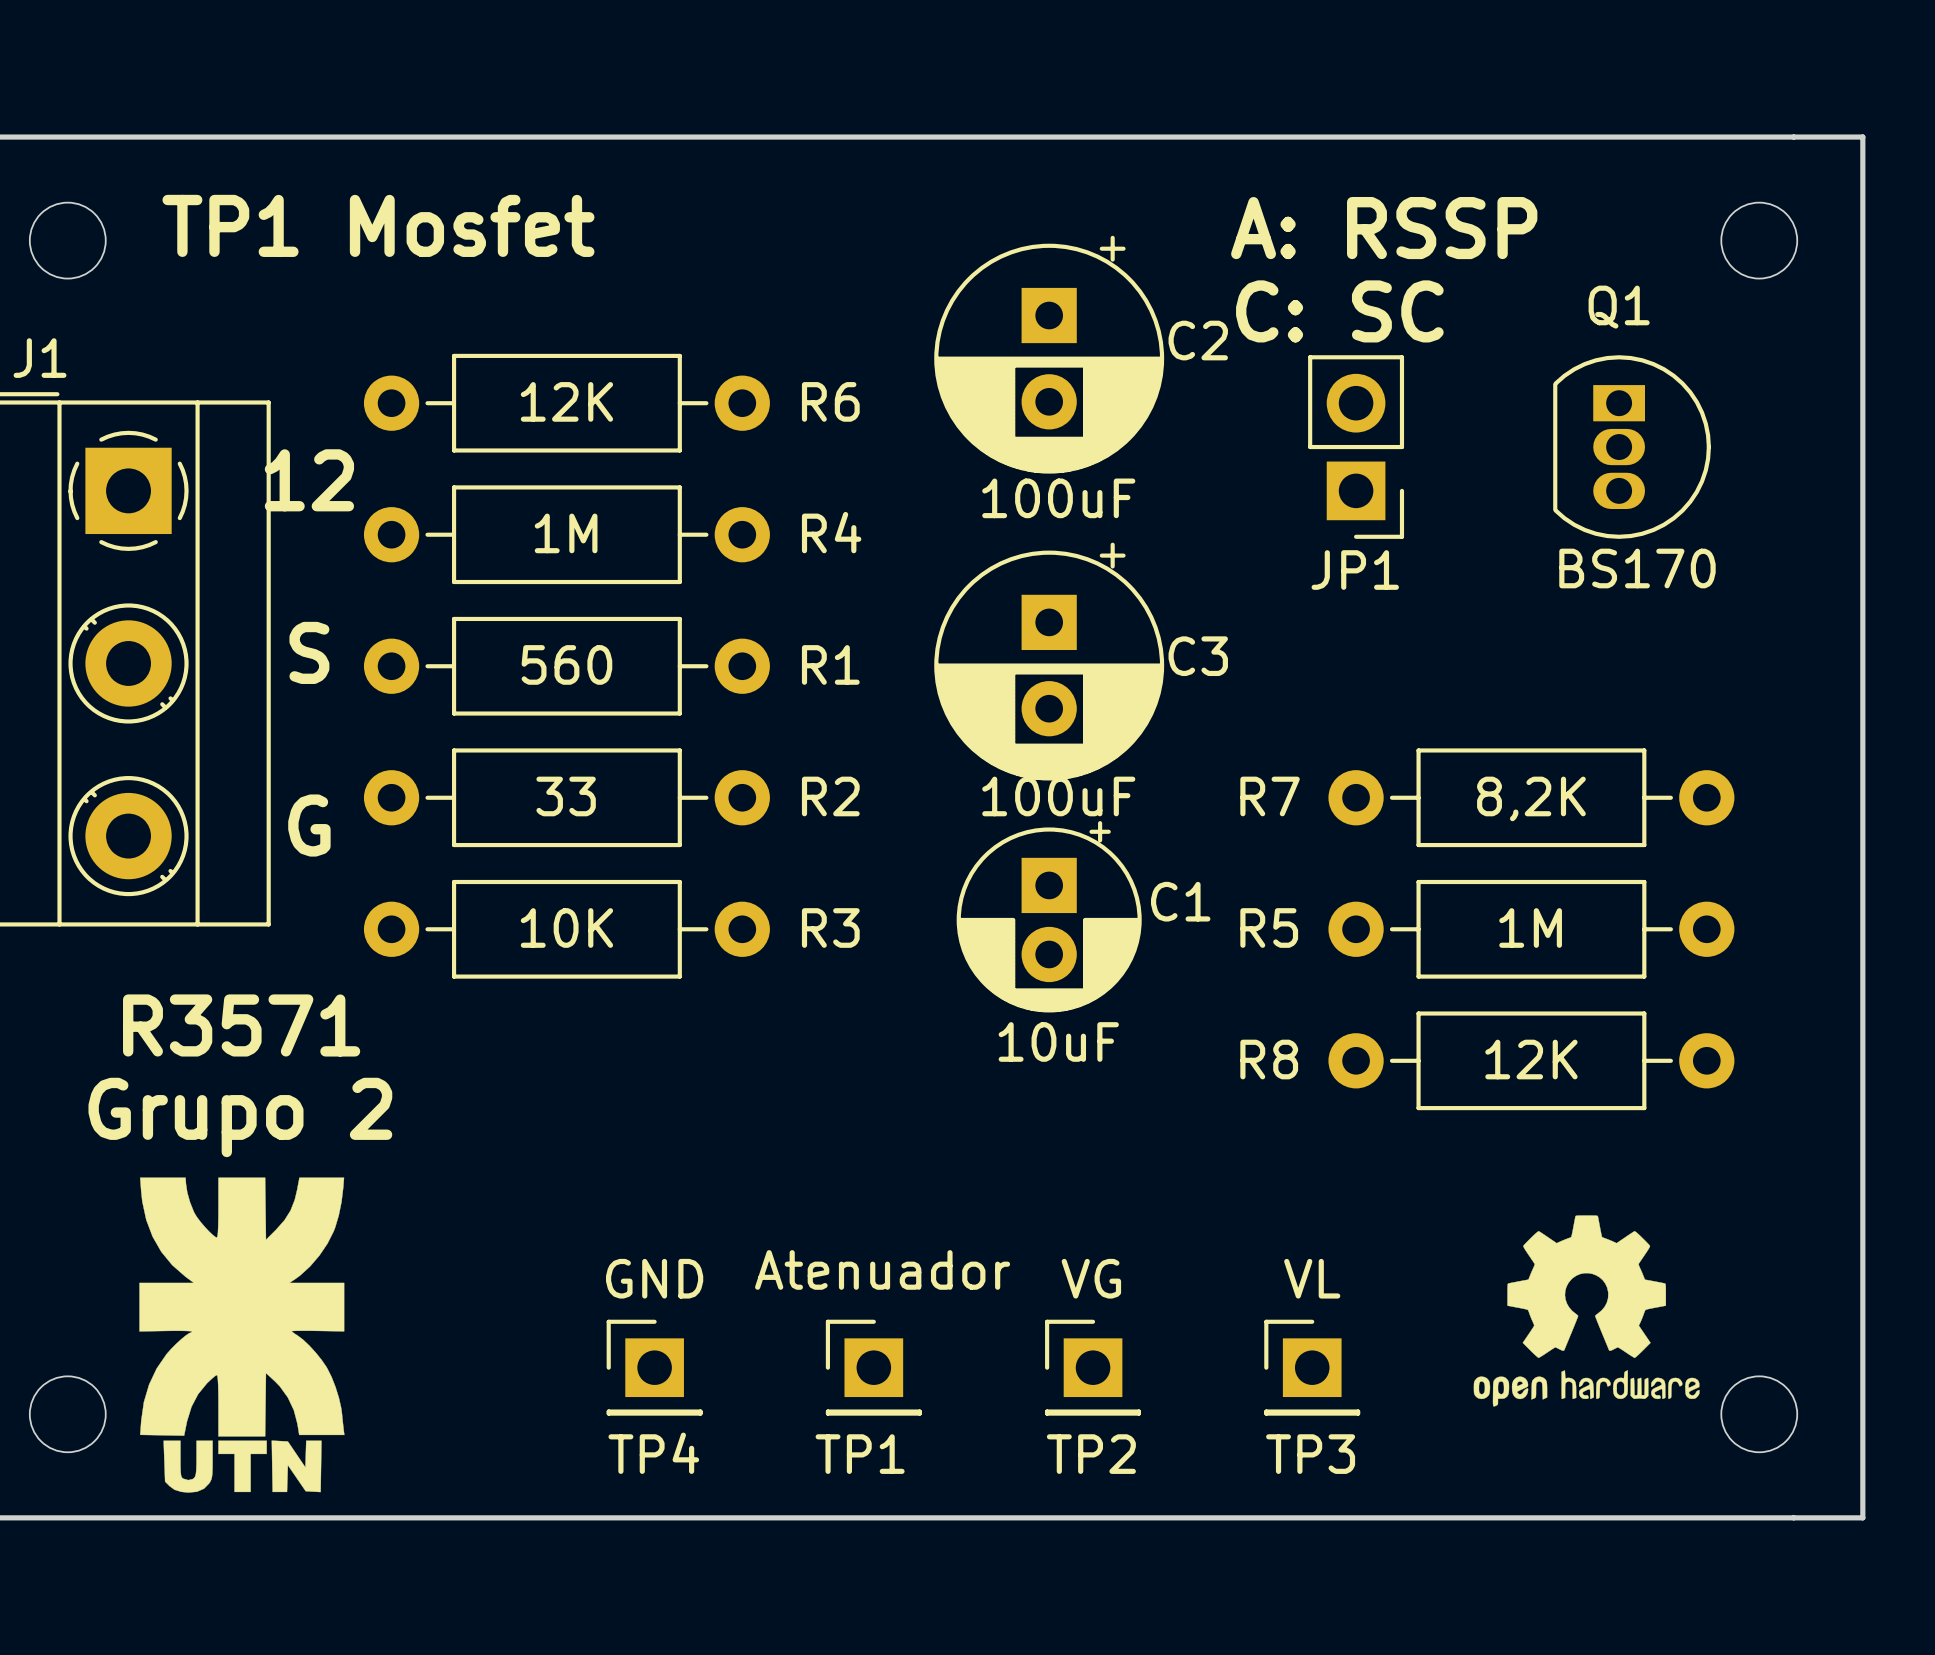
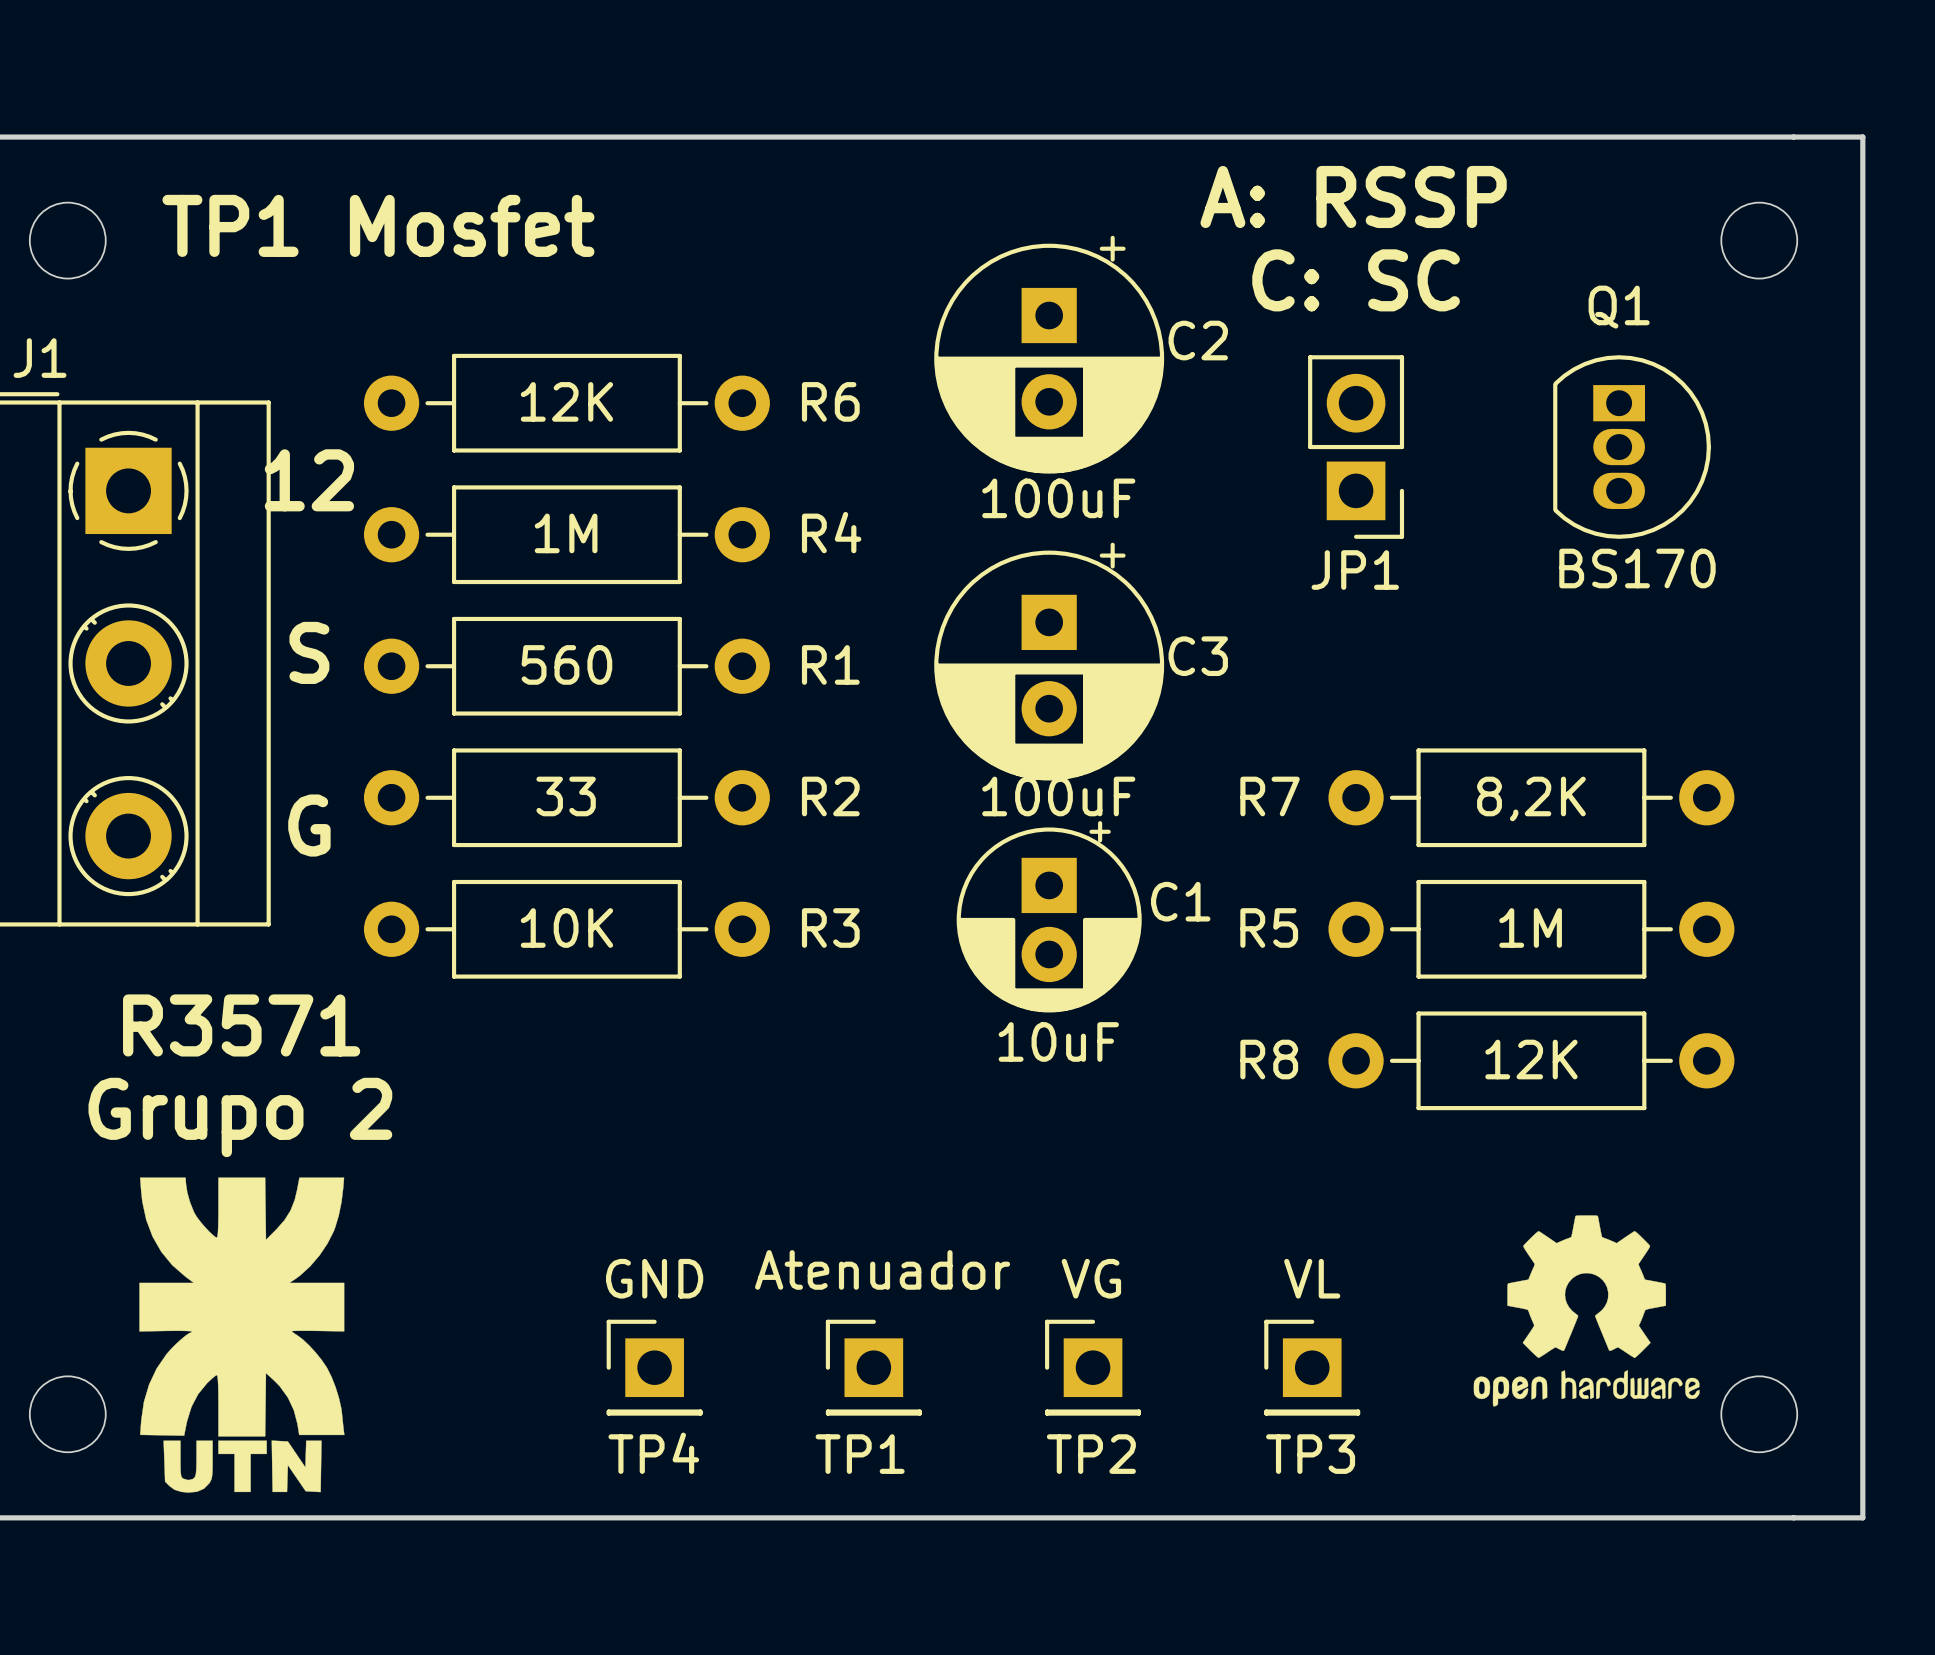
text position: A: RSSP (1384, 228) -> A: RSSP (1353, 196)
text position: C: SC (1339, 311) -> C: SC (1356, 280)

